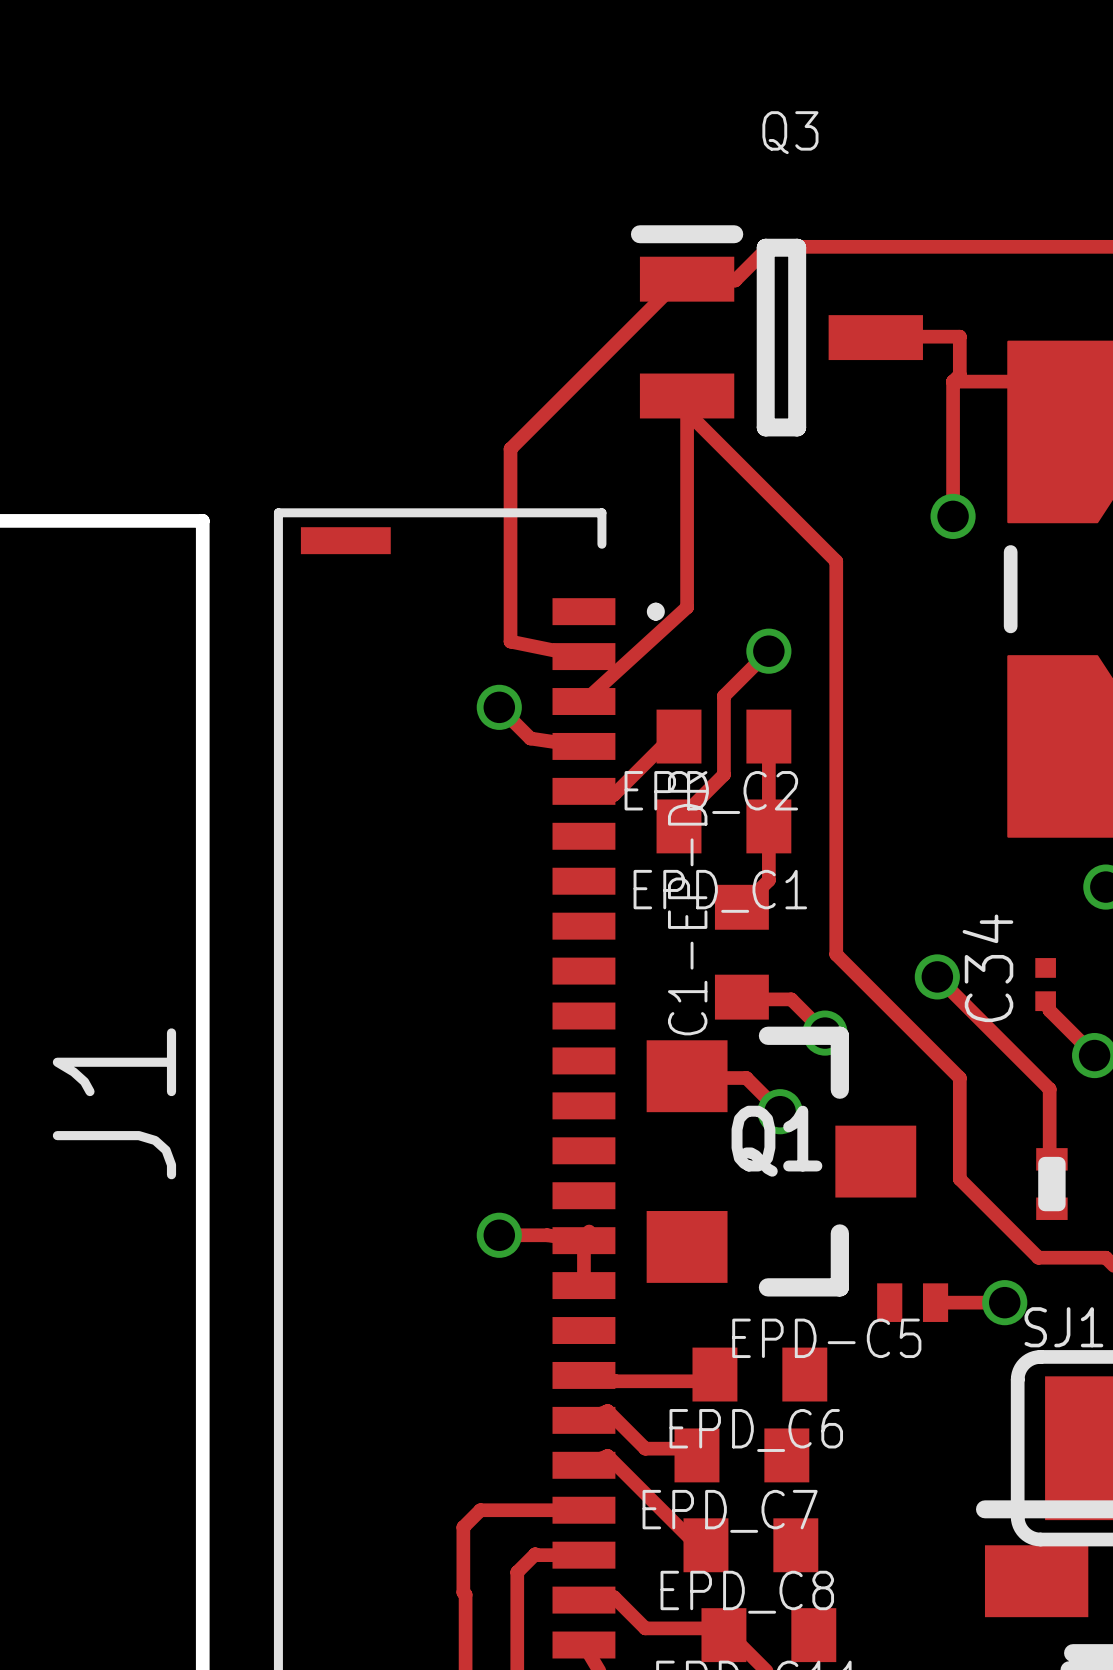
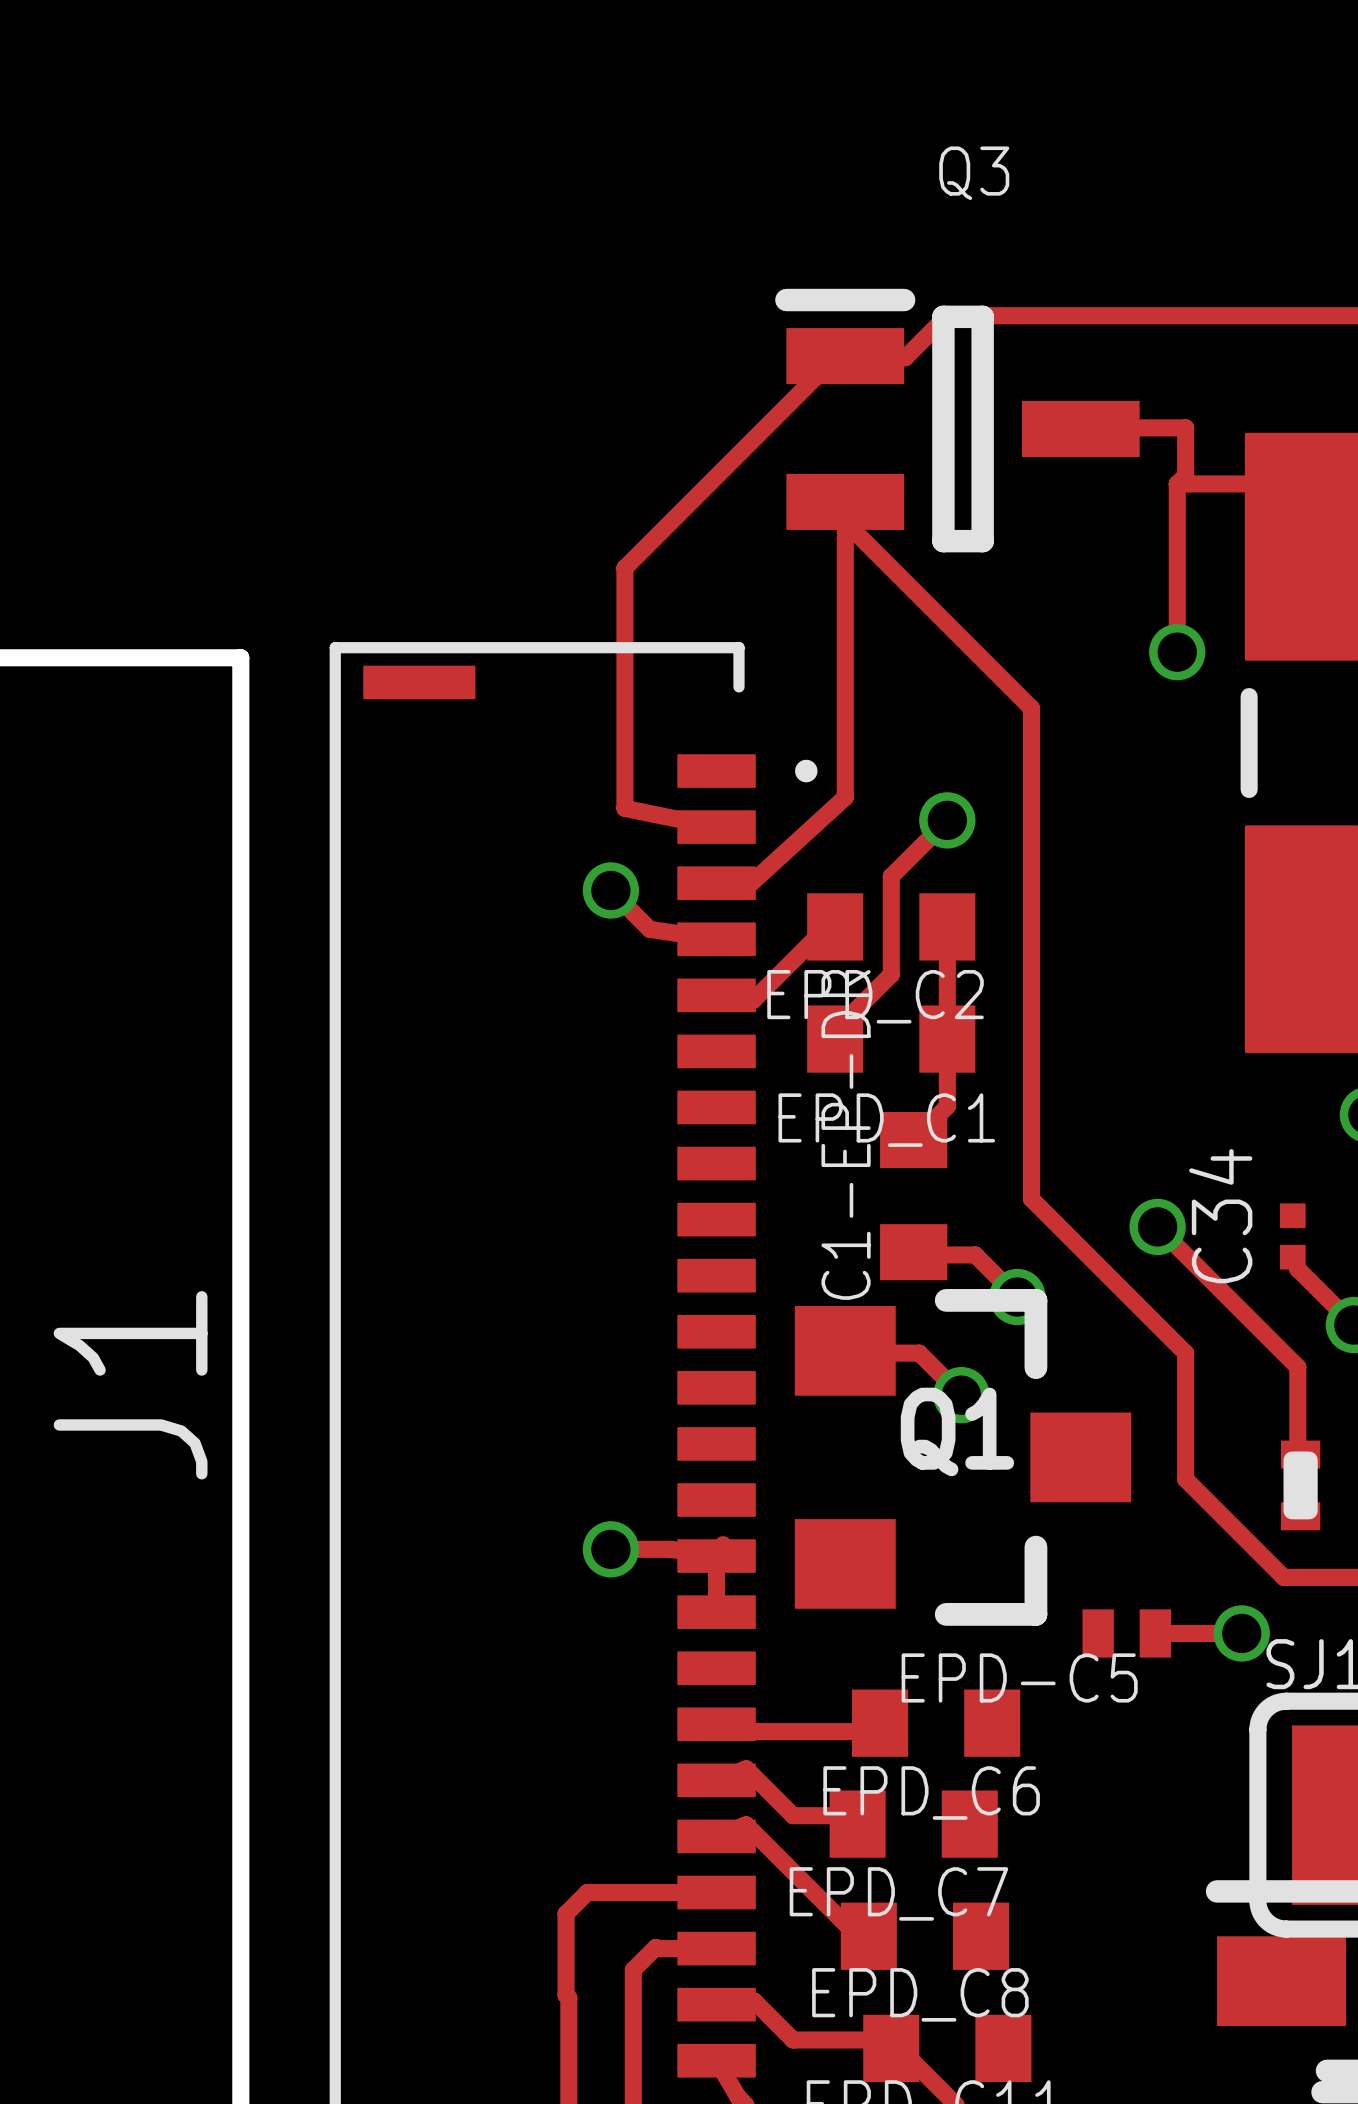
track: (687, 607) (583, 701) -> (845, 765) (845, 797) (751, 883) (716, 883)

